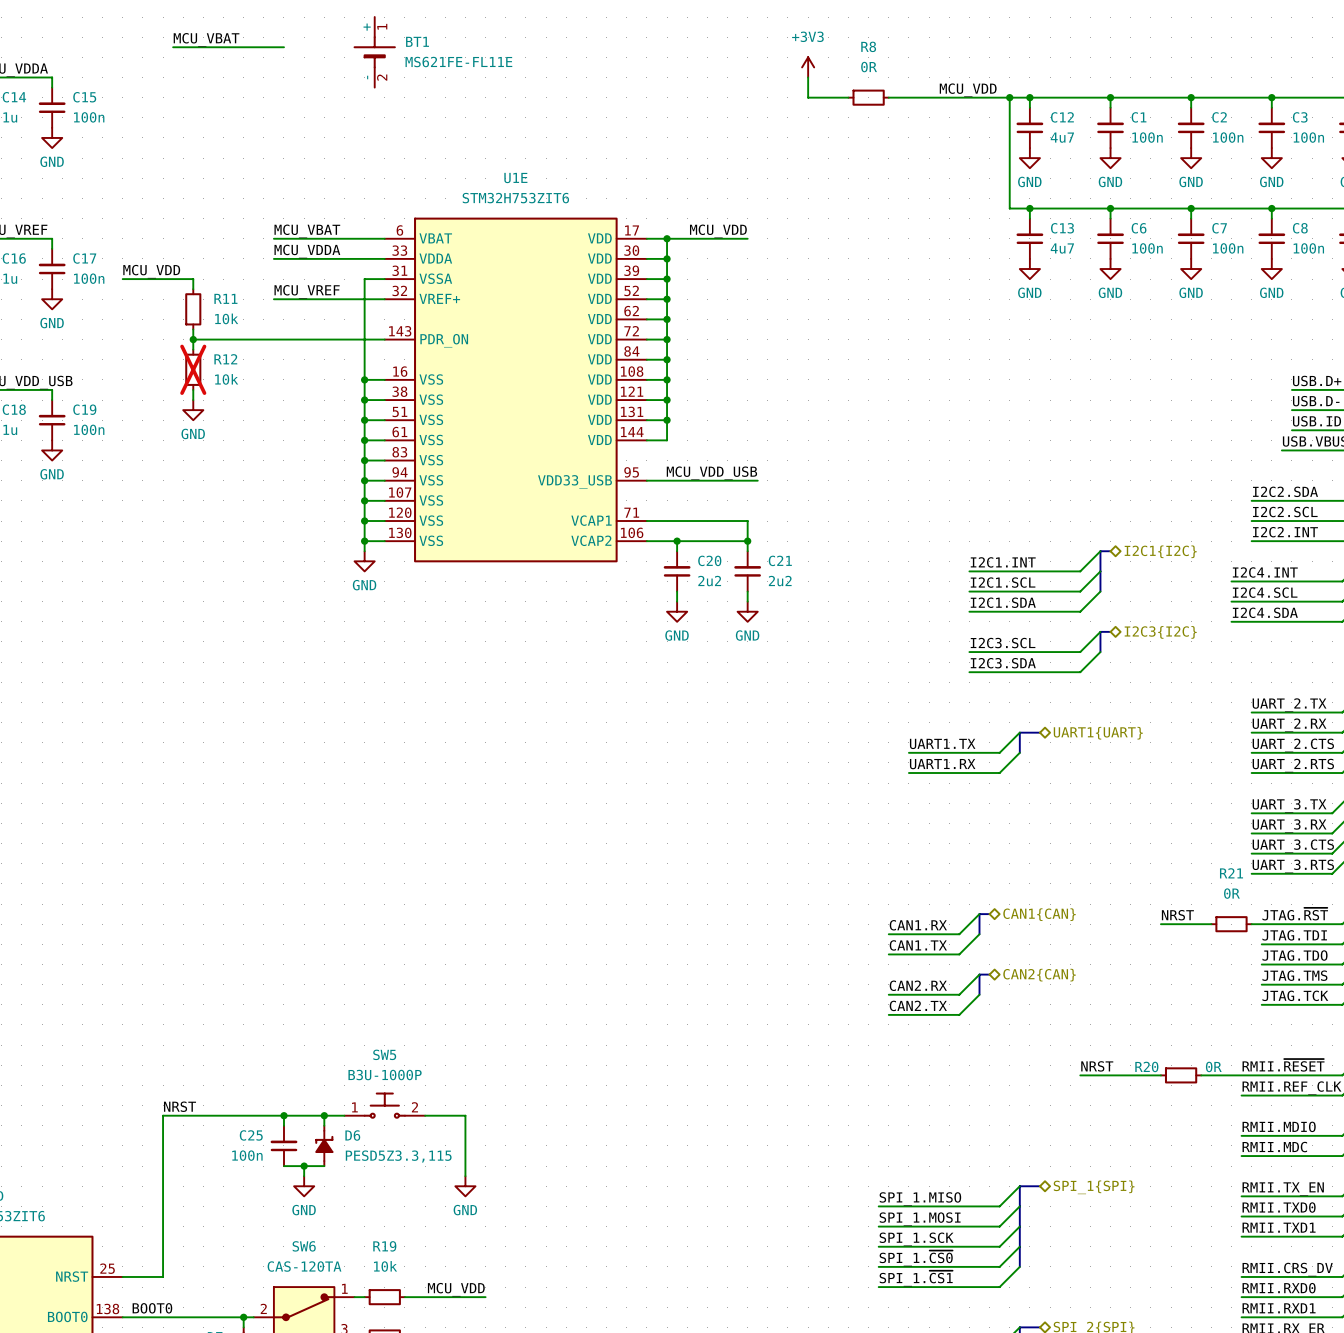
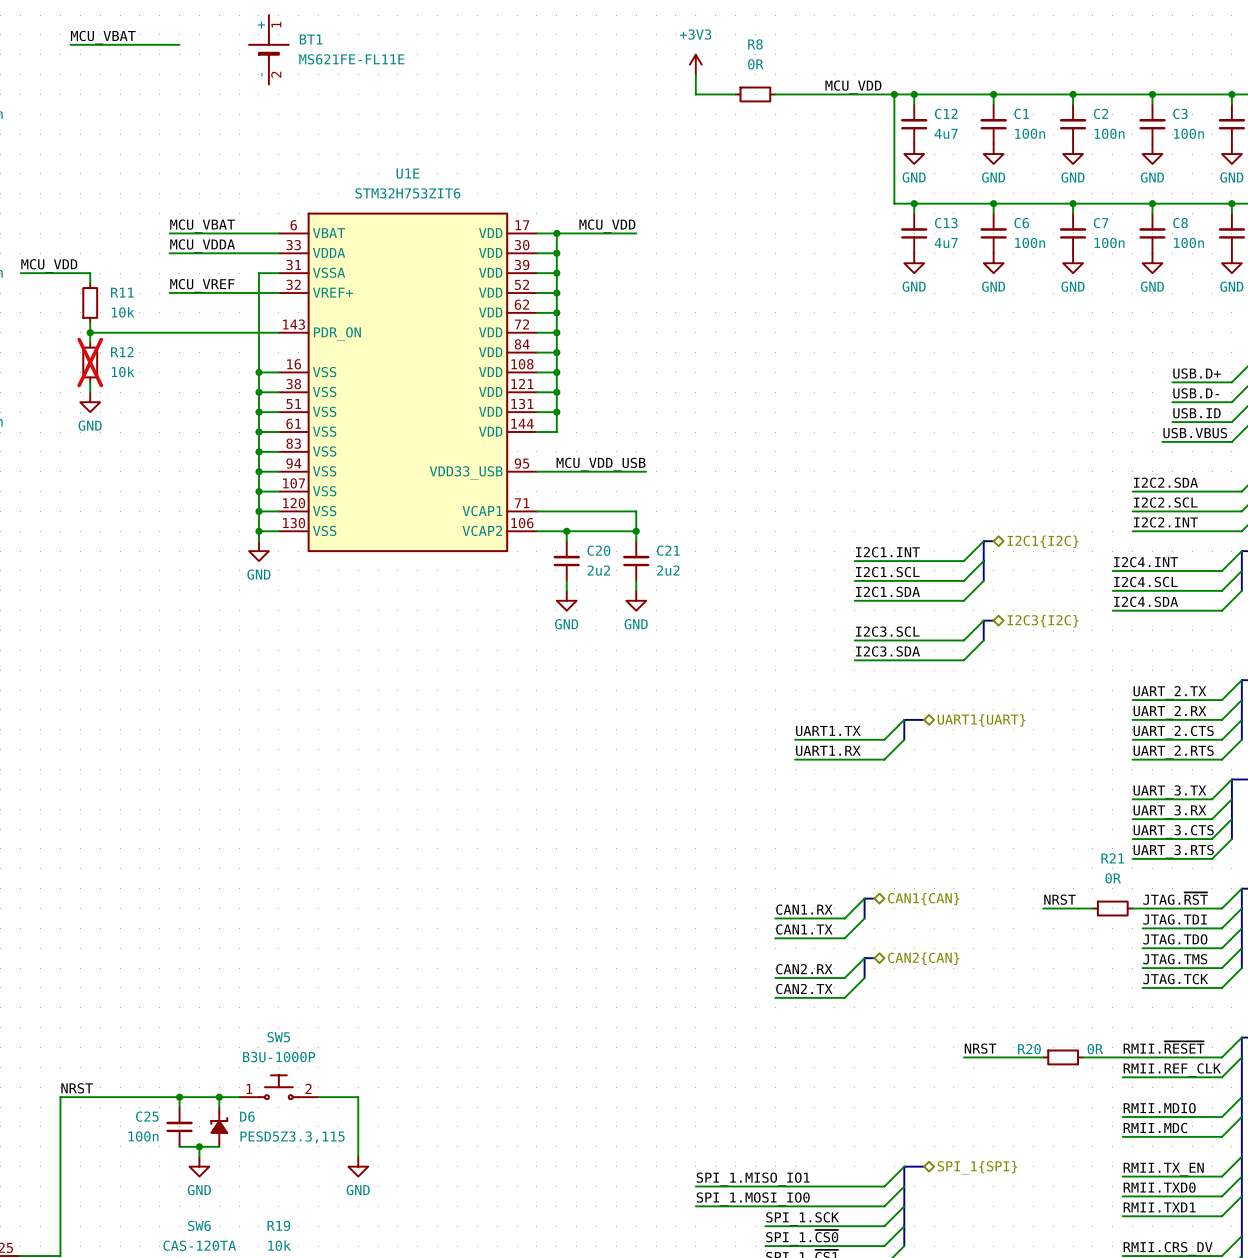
label: none -> SPI_1.MISO_IO1 (753, 1179)
label: SPI_1.MISO (920, 1198) -> none
wire: none -> (695, 1186) (765, 1186)
label: none -> SPI_1.MOSI_IO0 (753, 1199)
label: SPI_1.MOSI (920, 1219) -> none
wire: none -> (695, 1206) (765, 1206)

